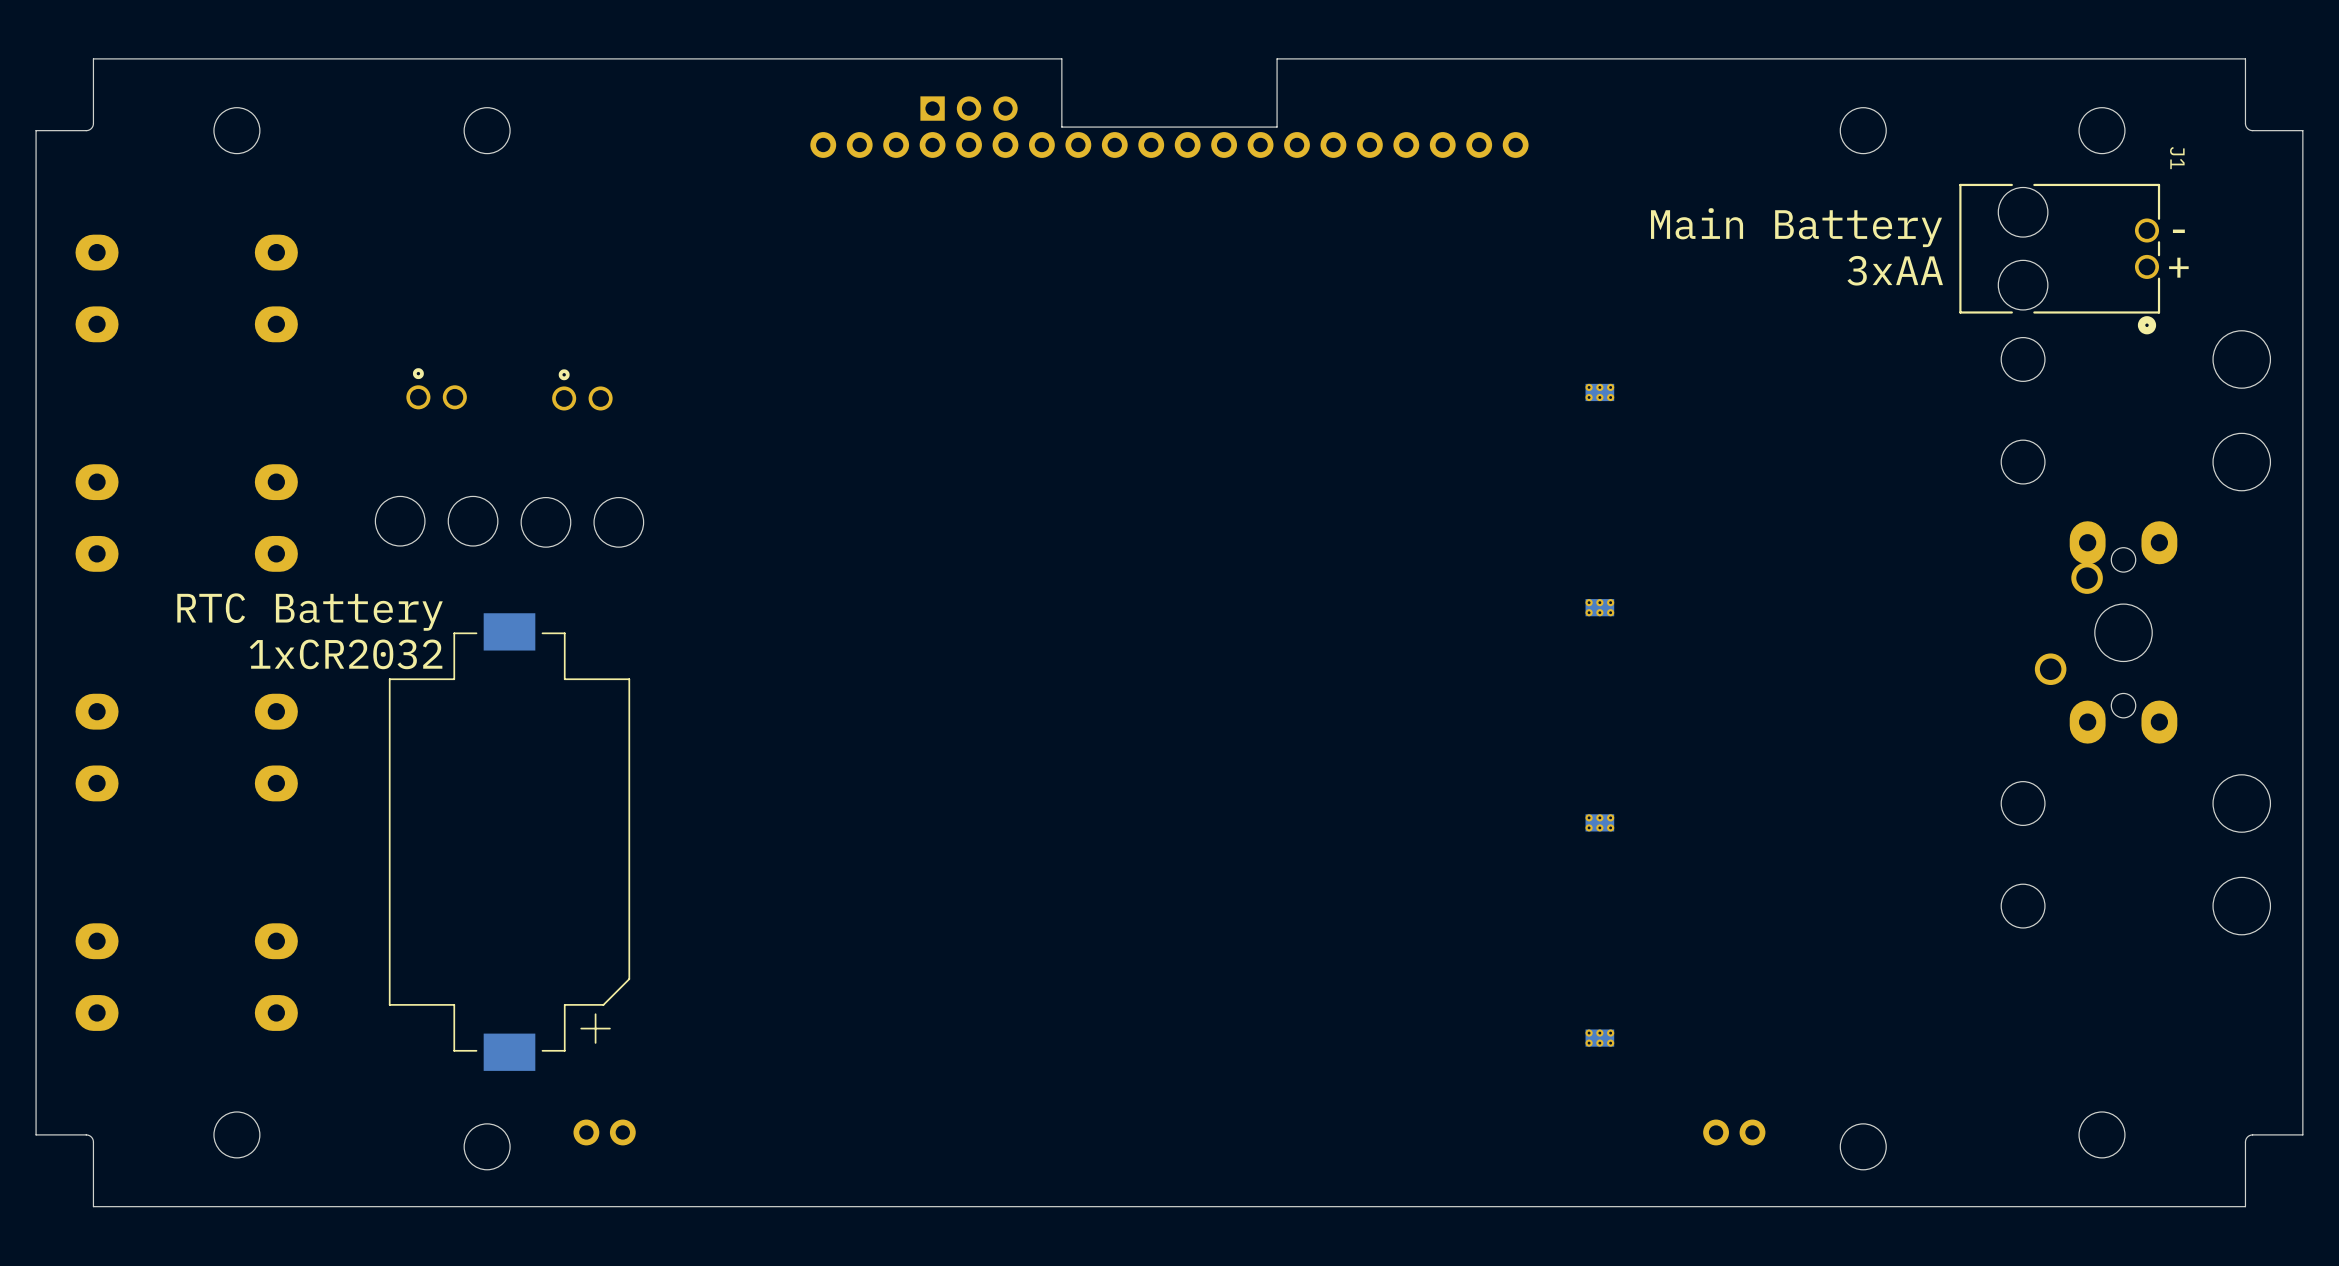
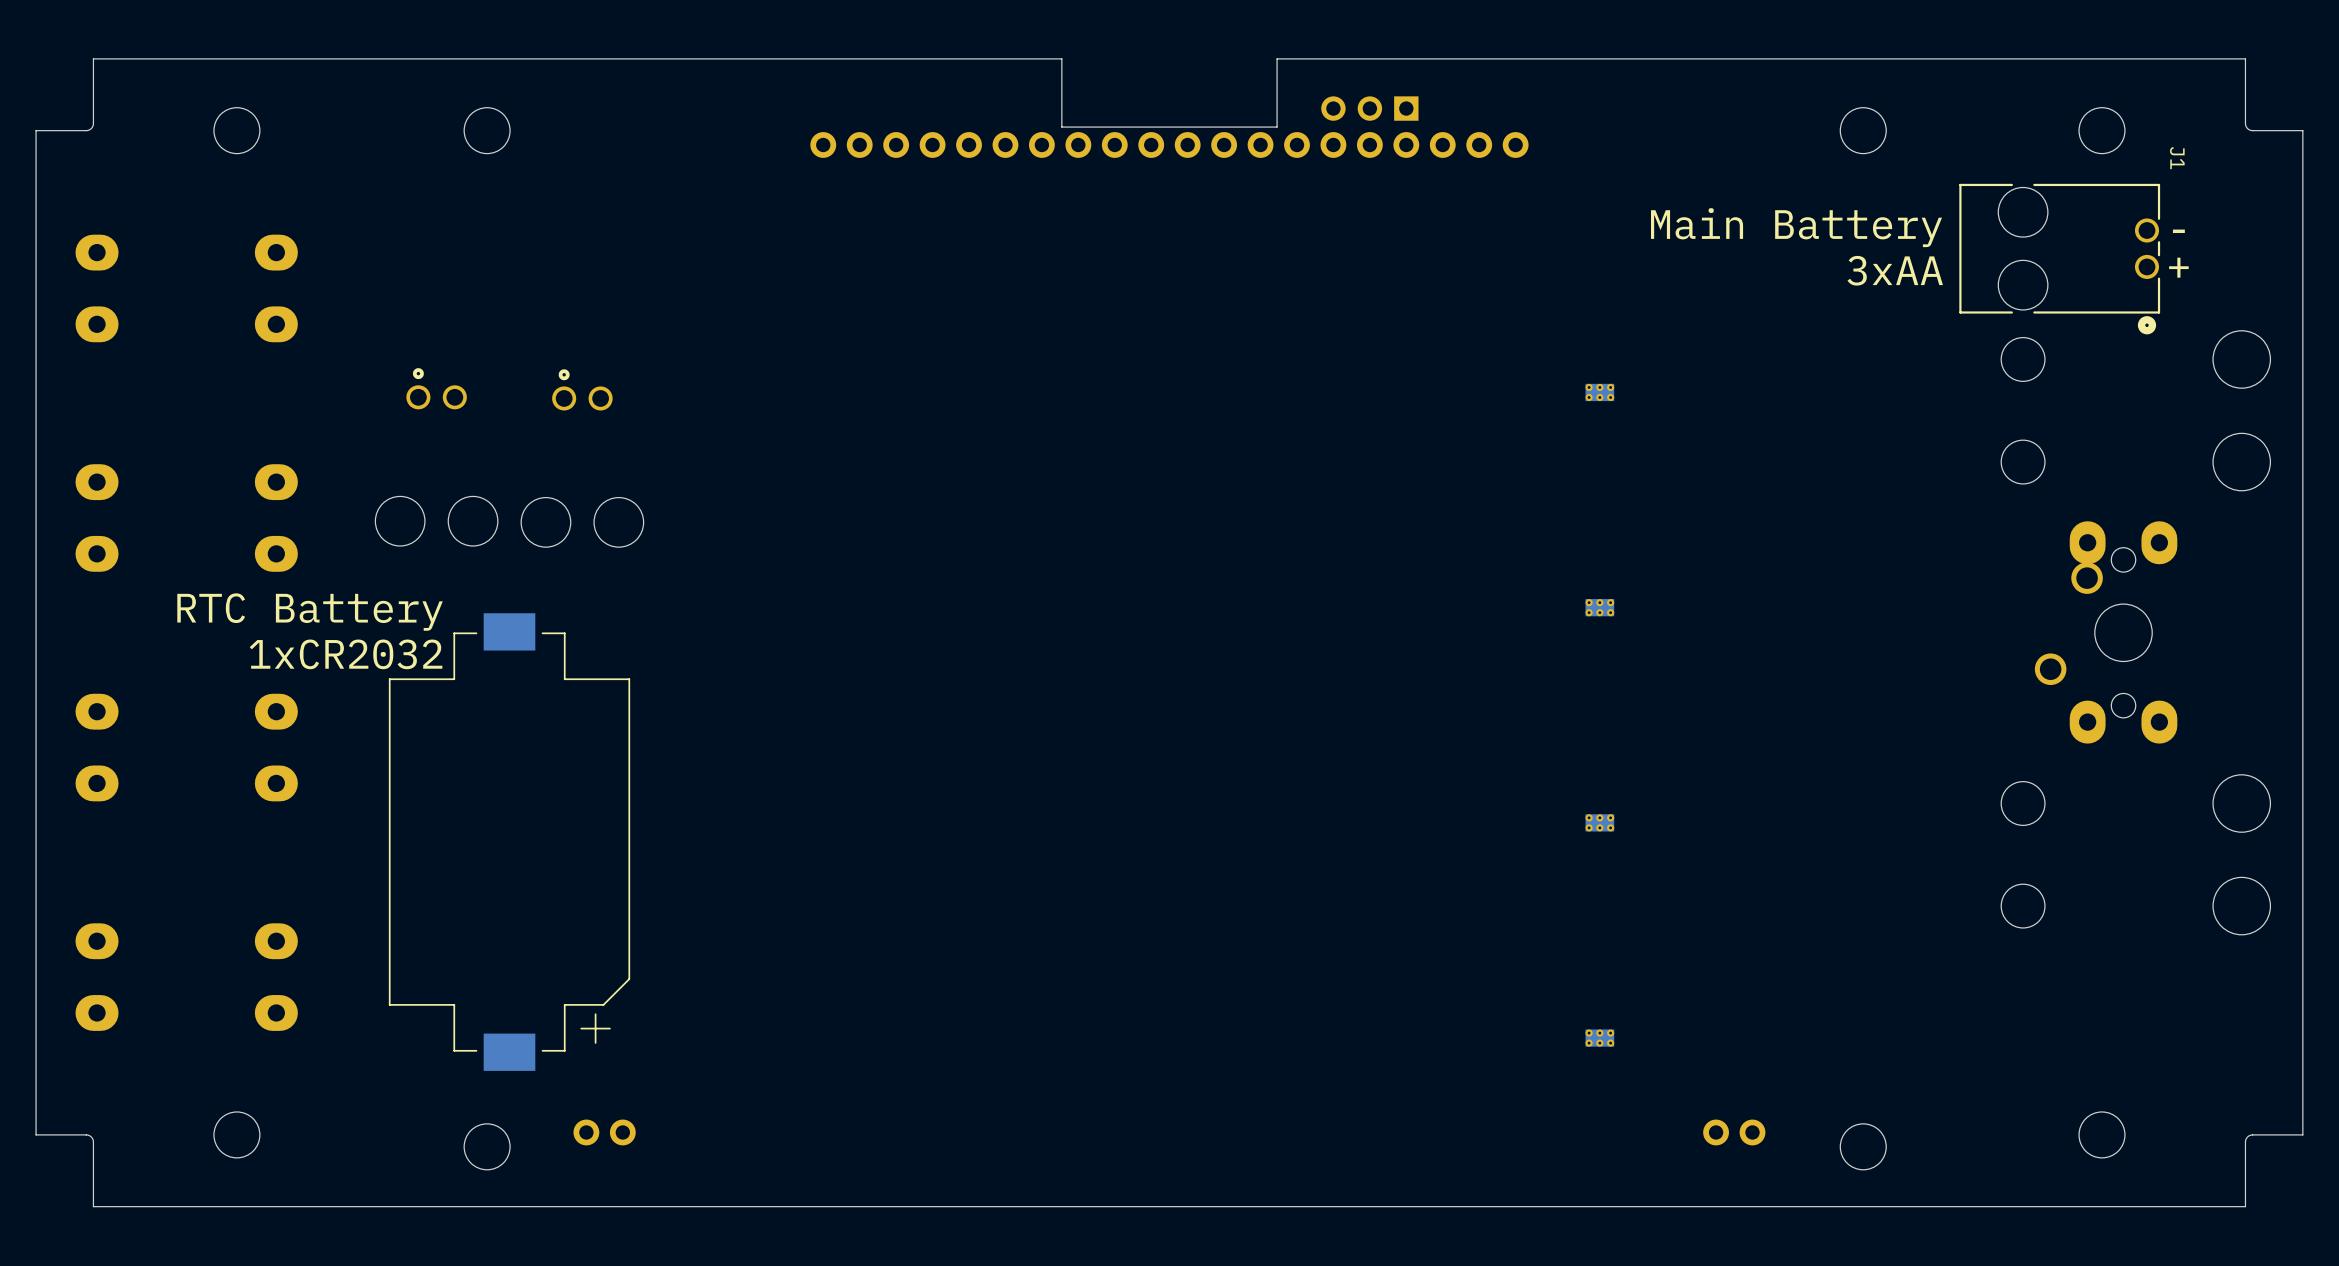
part: (969, 108) -> none
part: none -> (1369, 108)

